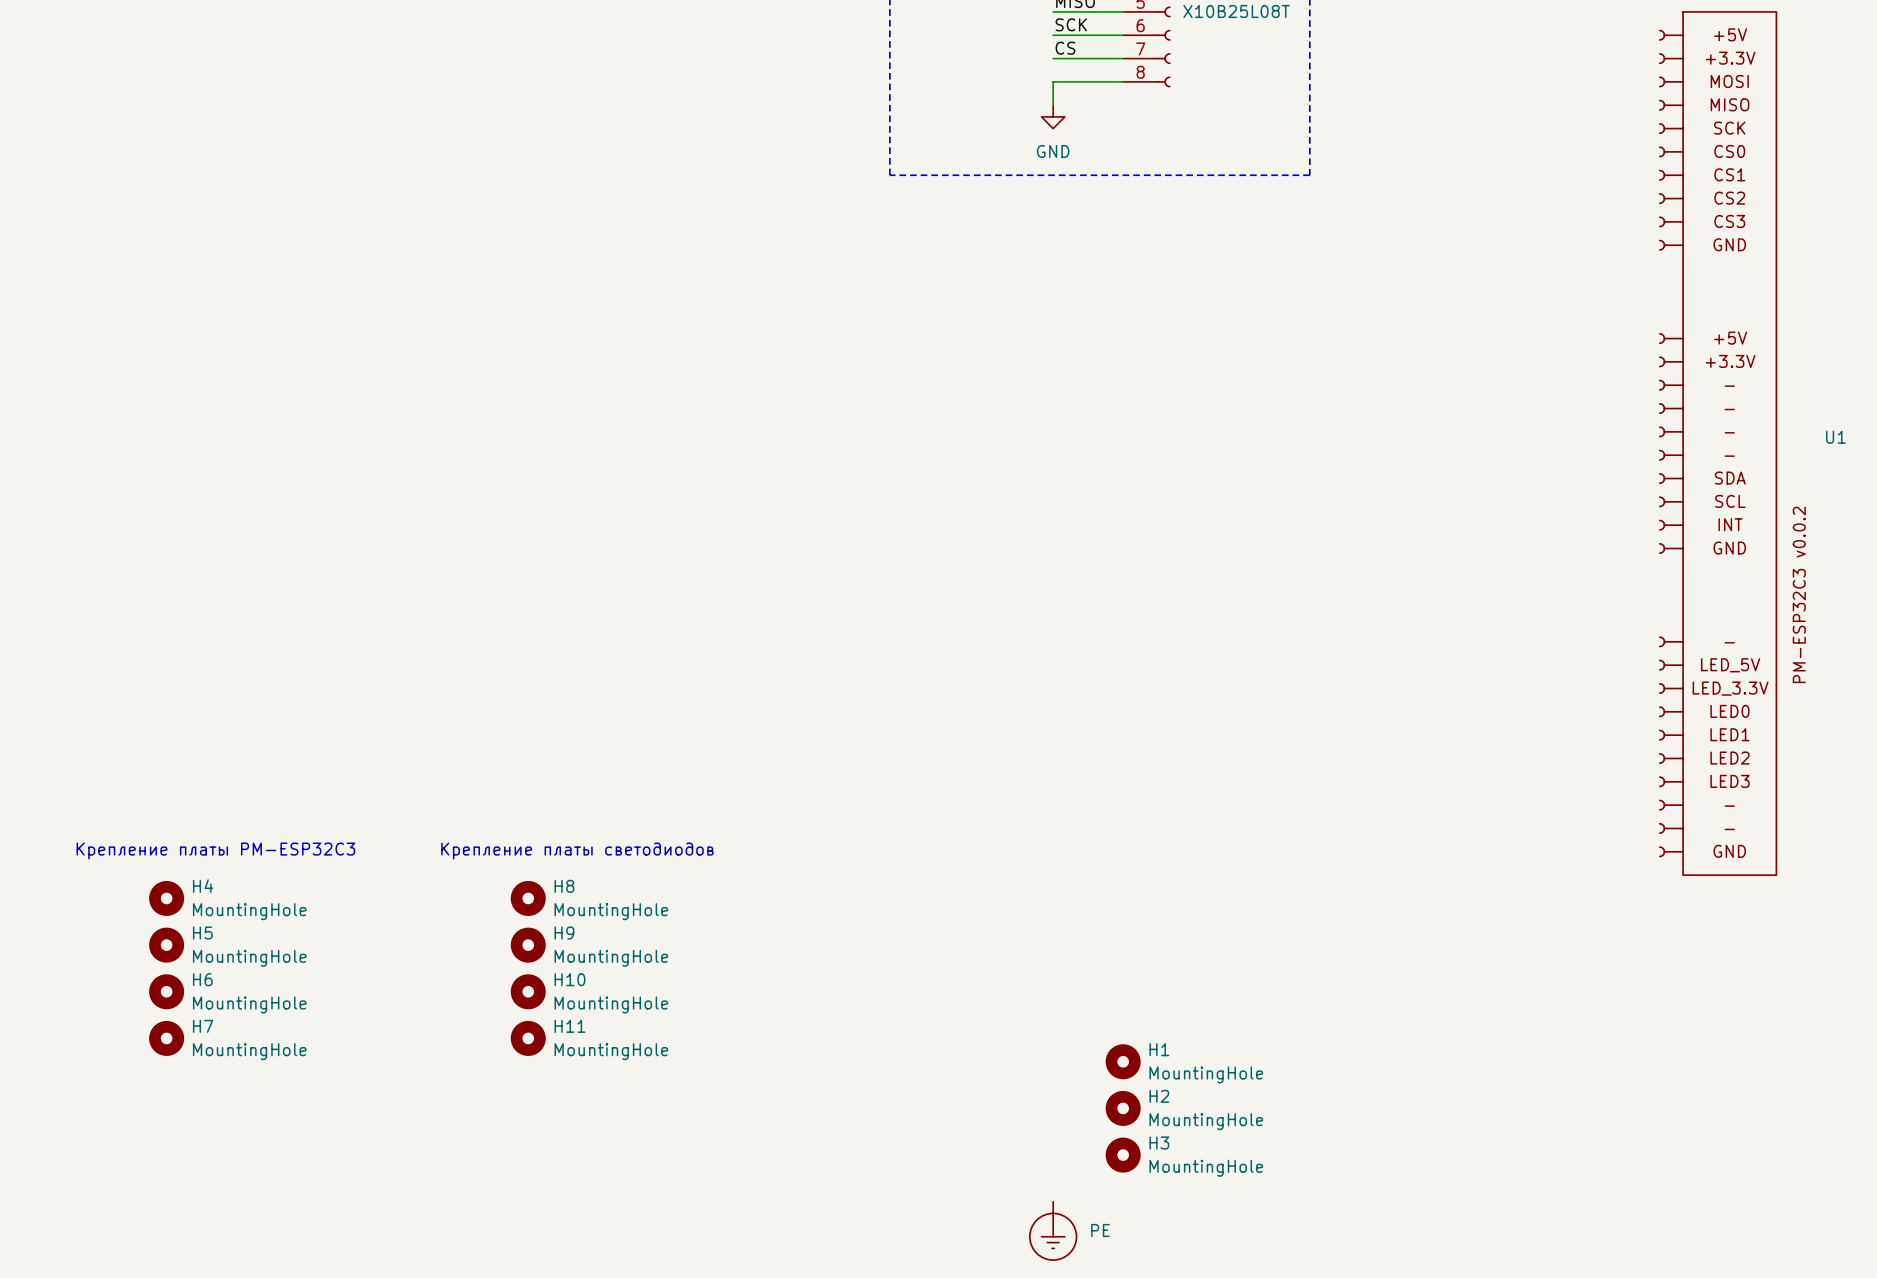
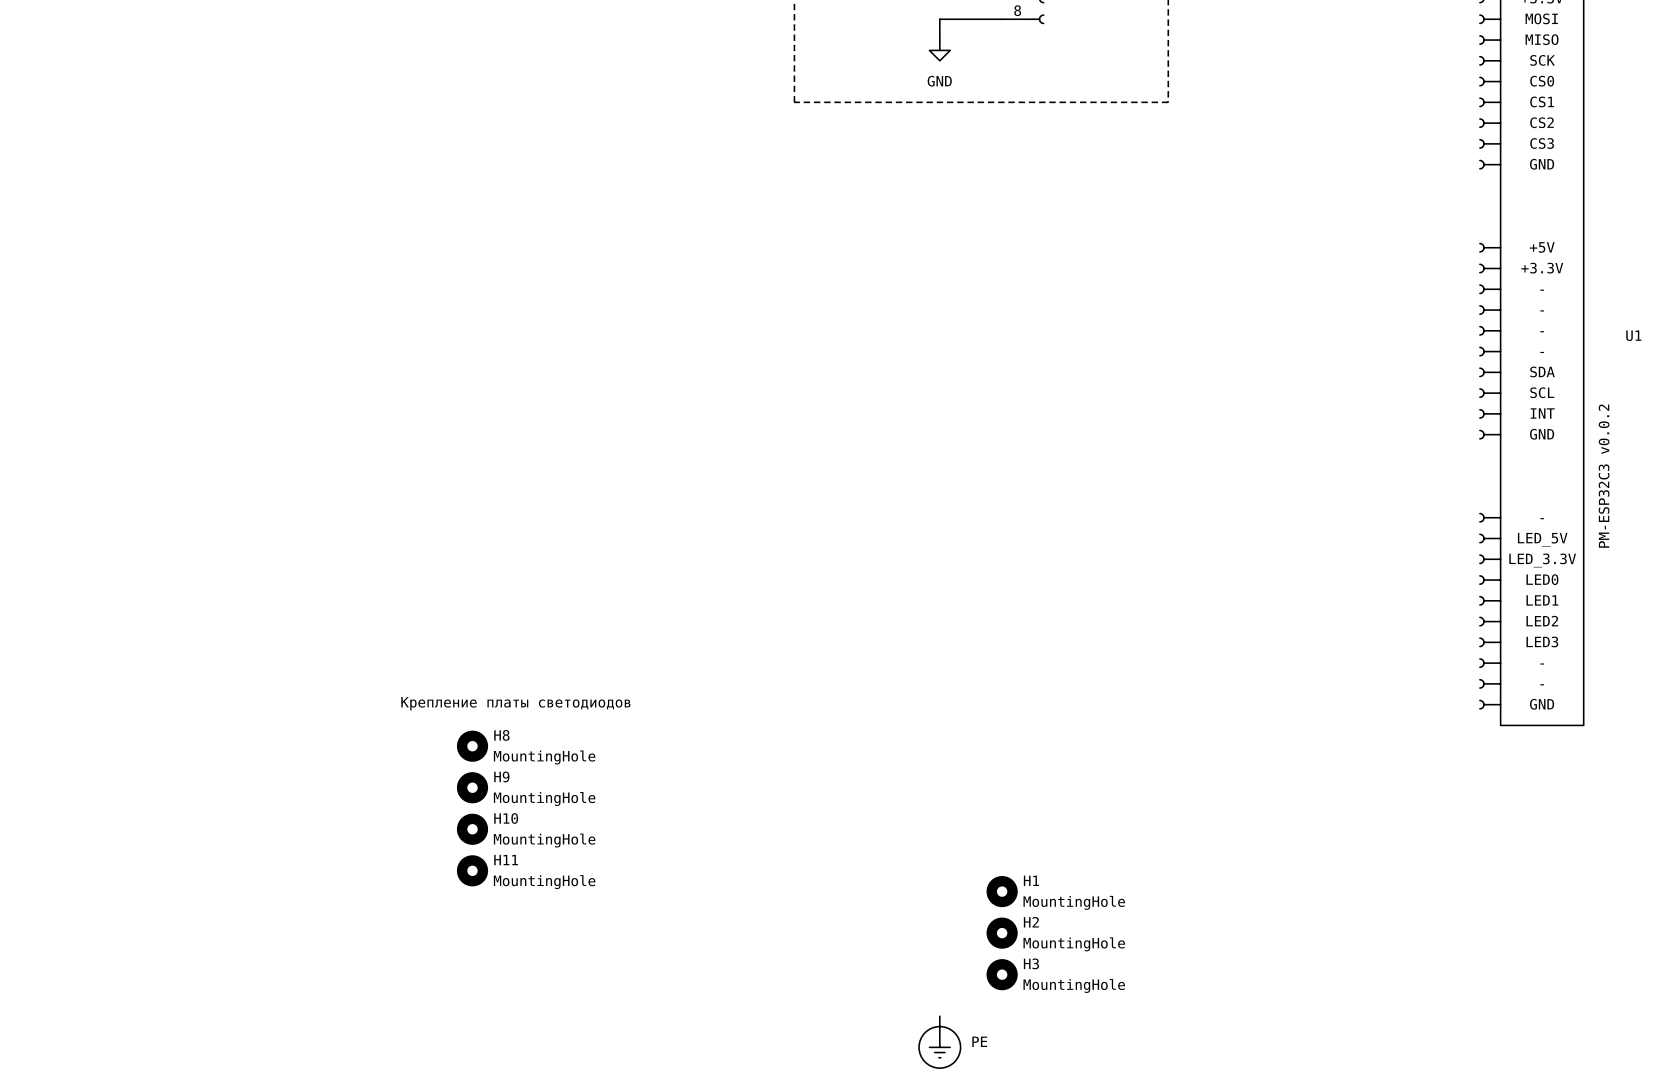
text: Крепление платы PM-ESP32C3 (215, 851) -> none
H4: MountingHole (166, 898) -> none
H5: MountingHole (166, 945) -> none
H6: MountingHole (166, 991) -> none
H7: MountingHole (166, 1038) -> none

